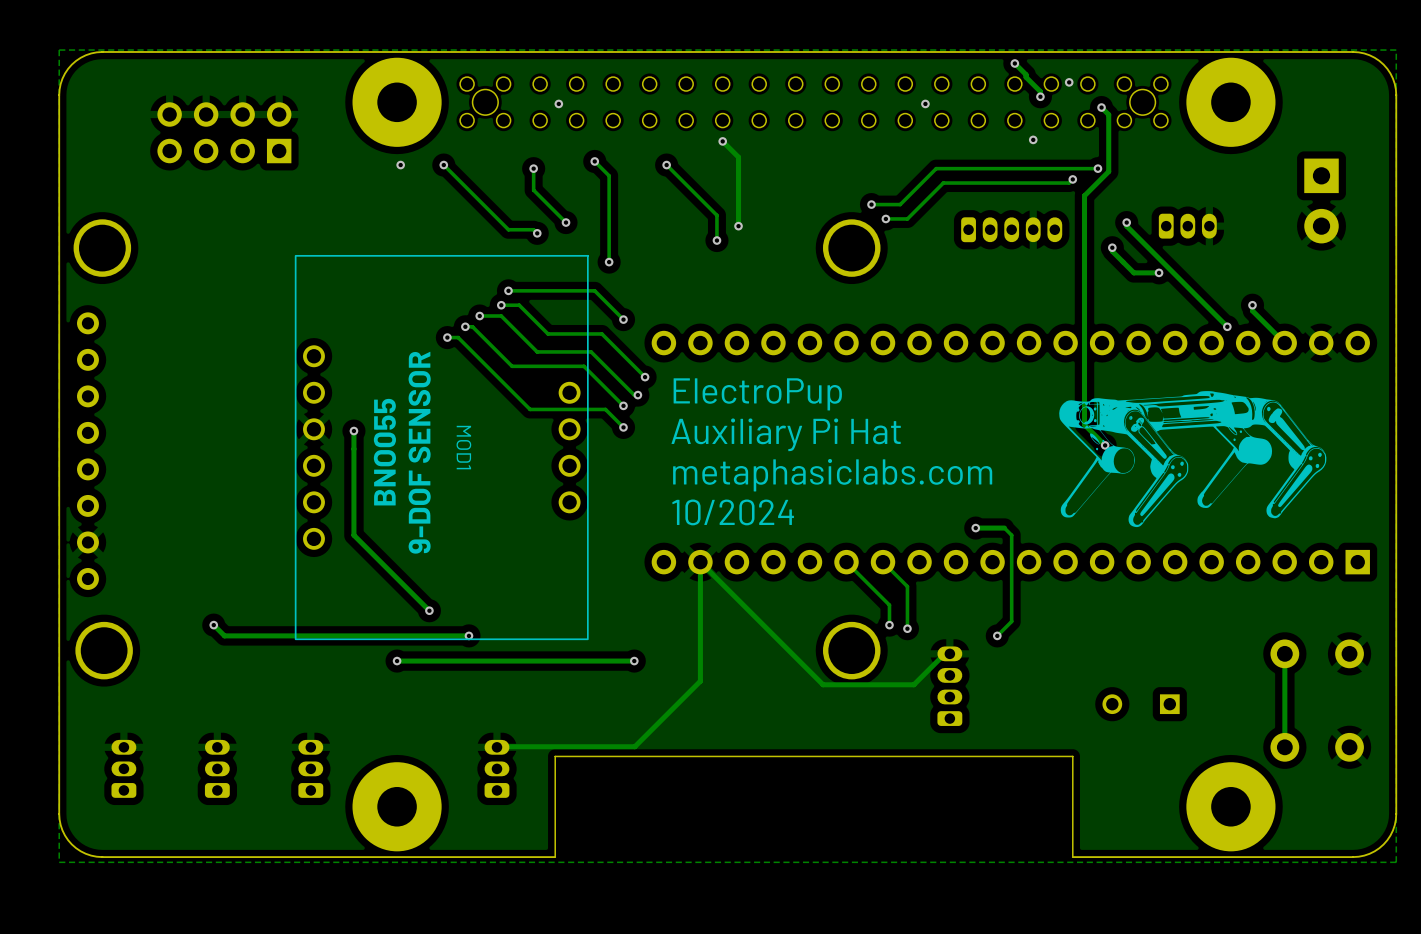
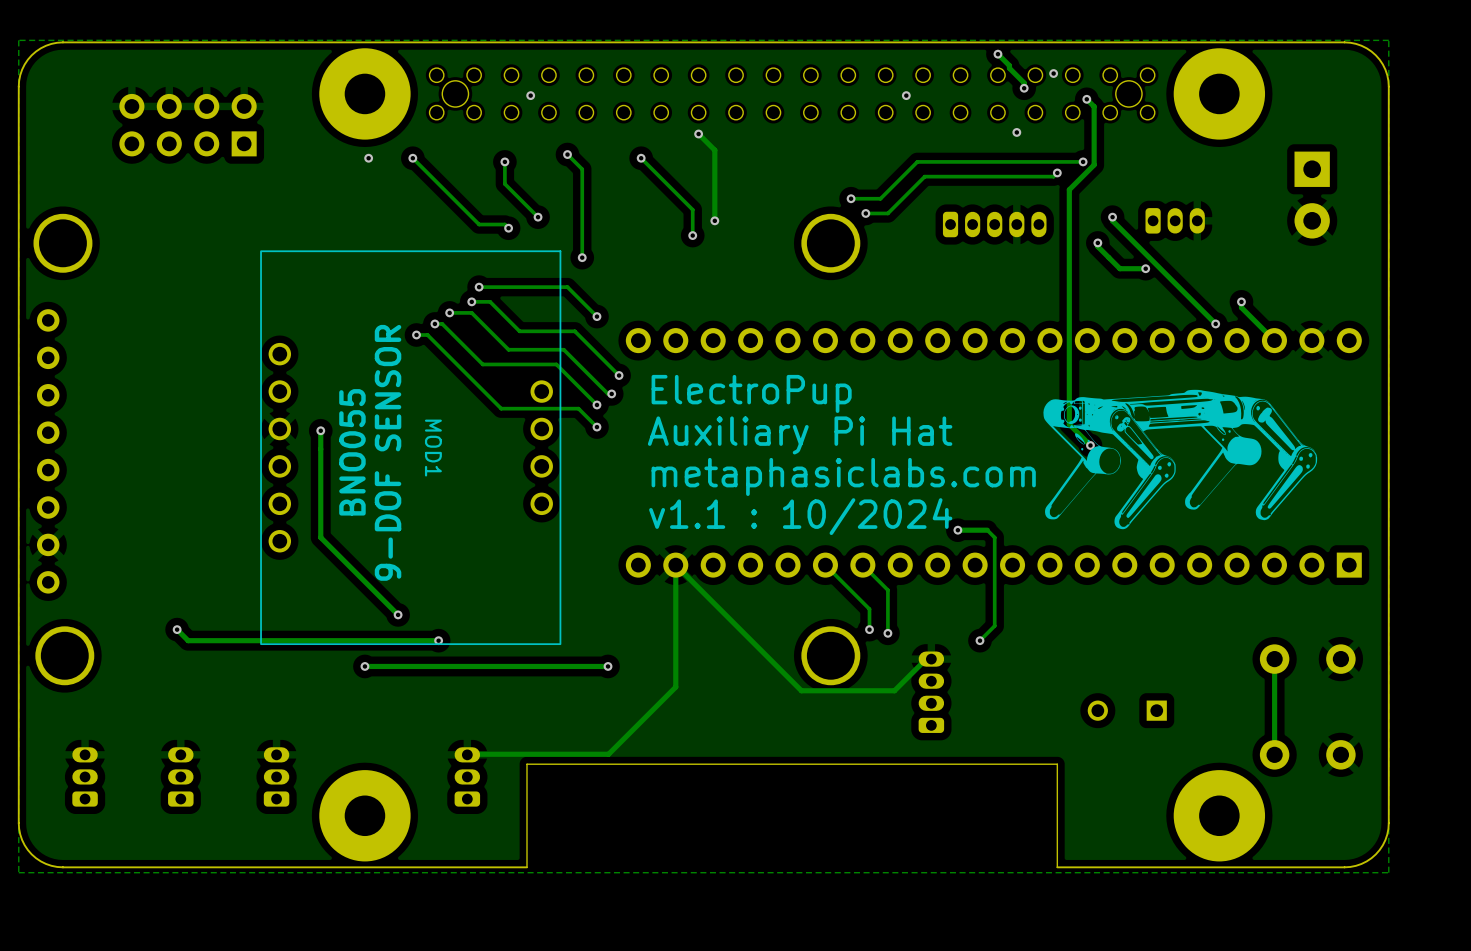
text: 10/2024 (733, 512) -> v1.1 : 10/2024 (800, 516)

